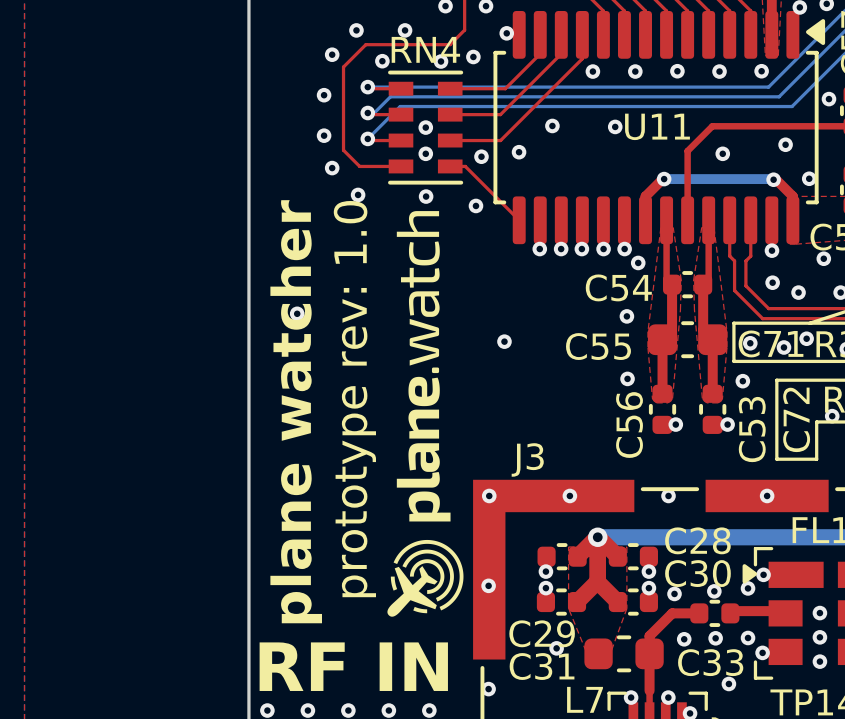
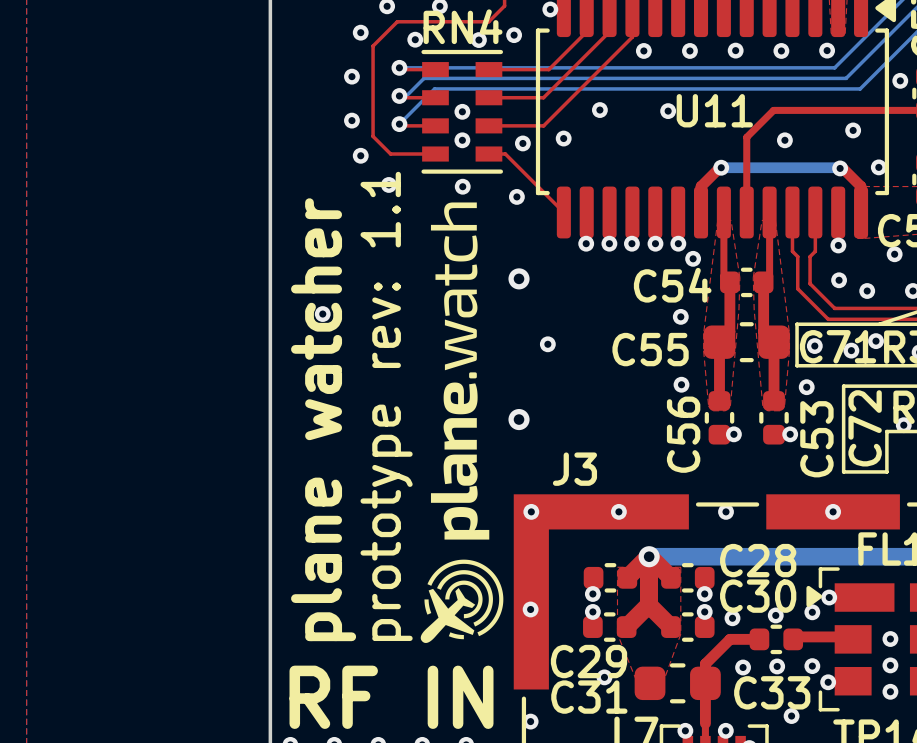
via: none -> (519, 278)
text: prototype rev: 1.0 (354, 399) -> prototype rev: 1.1 (386, 406)
via: none -> (519, 419)

